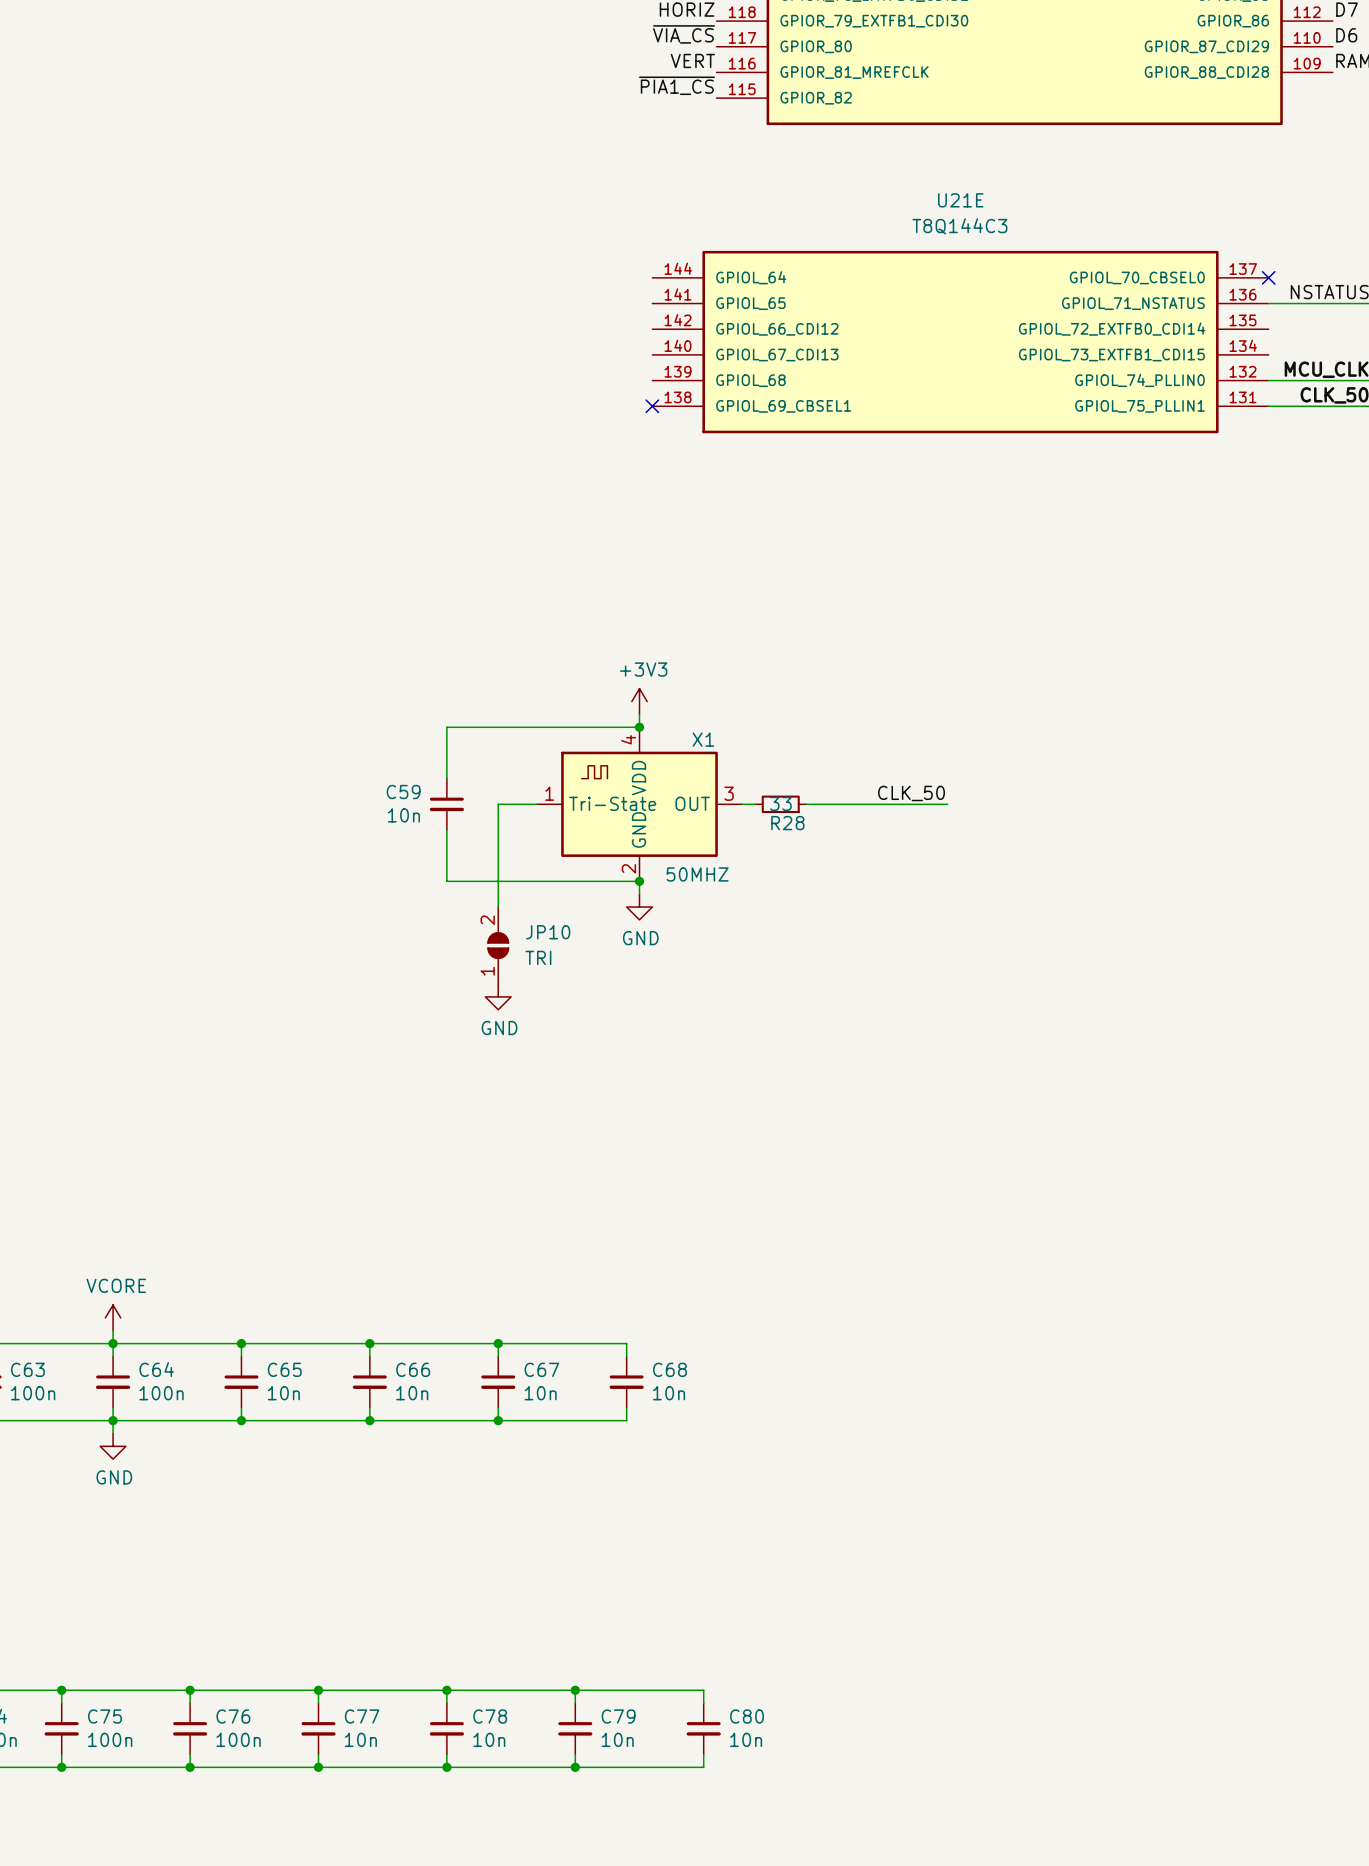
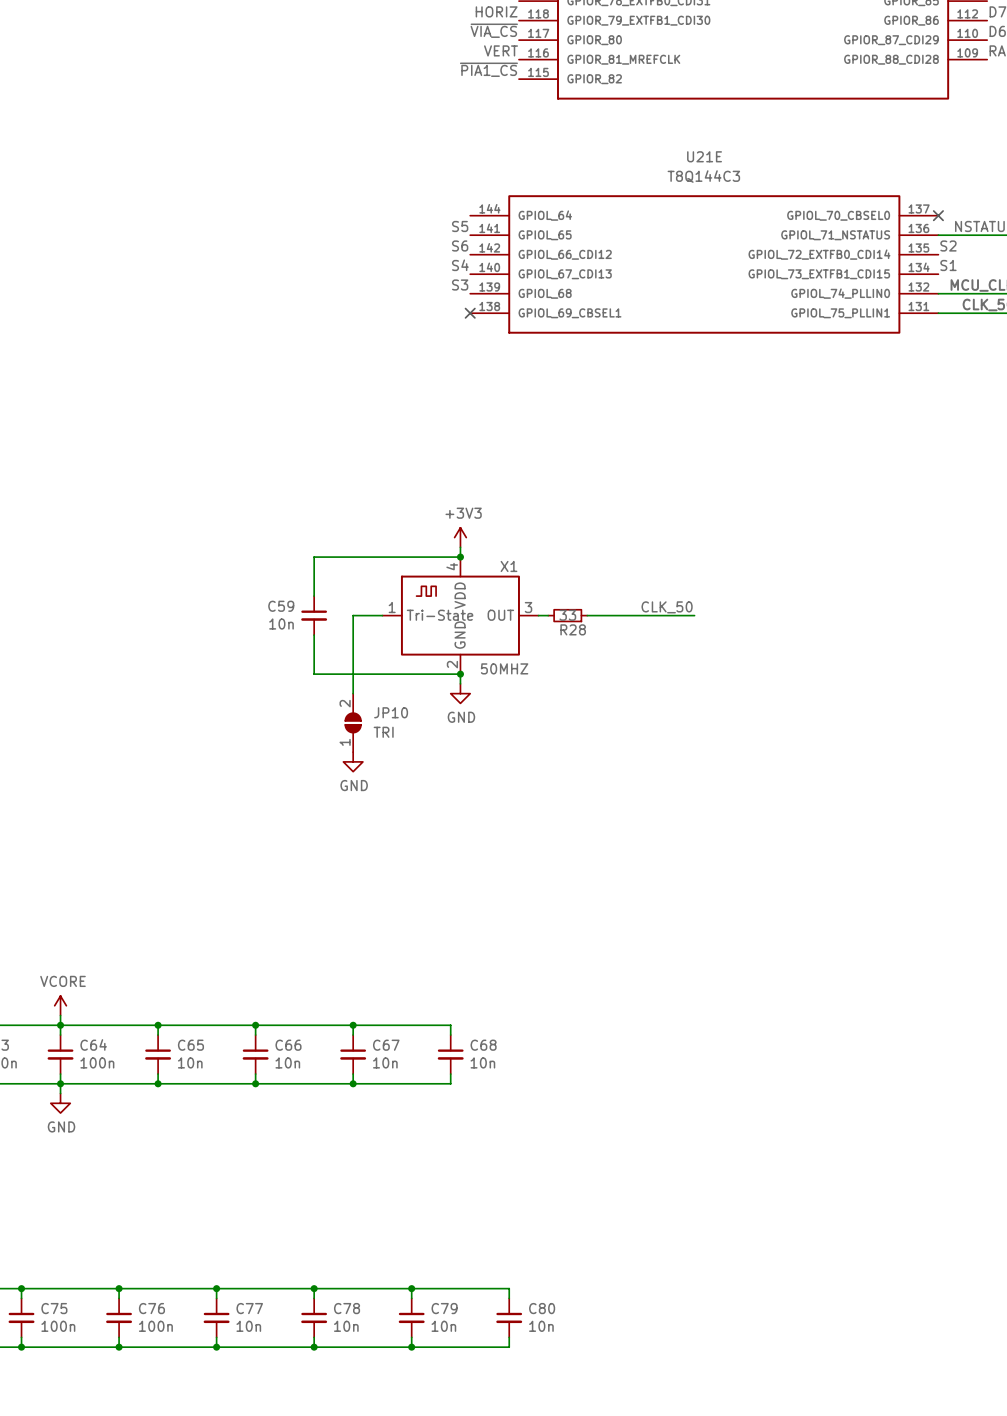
label: none -> S5 (460, 226)
label: none -> S6 (460, 245)
label: none -> S2 (948, 245)
label: none -> S4 (460, 265)
label: none -> S1 (948, 265)
label: none -> S3 (460, 285)

